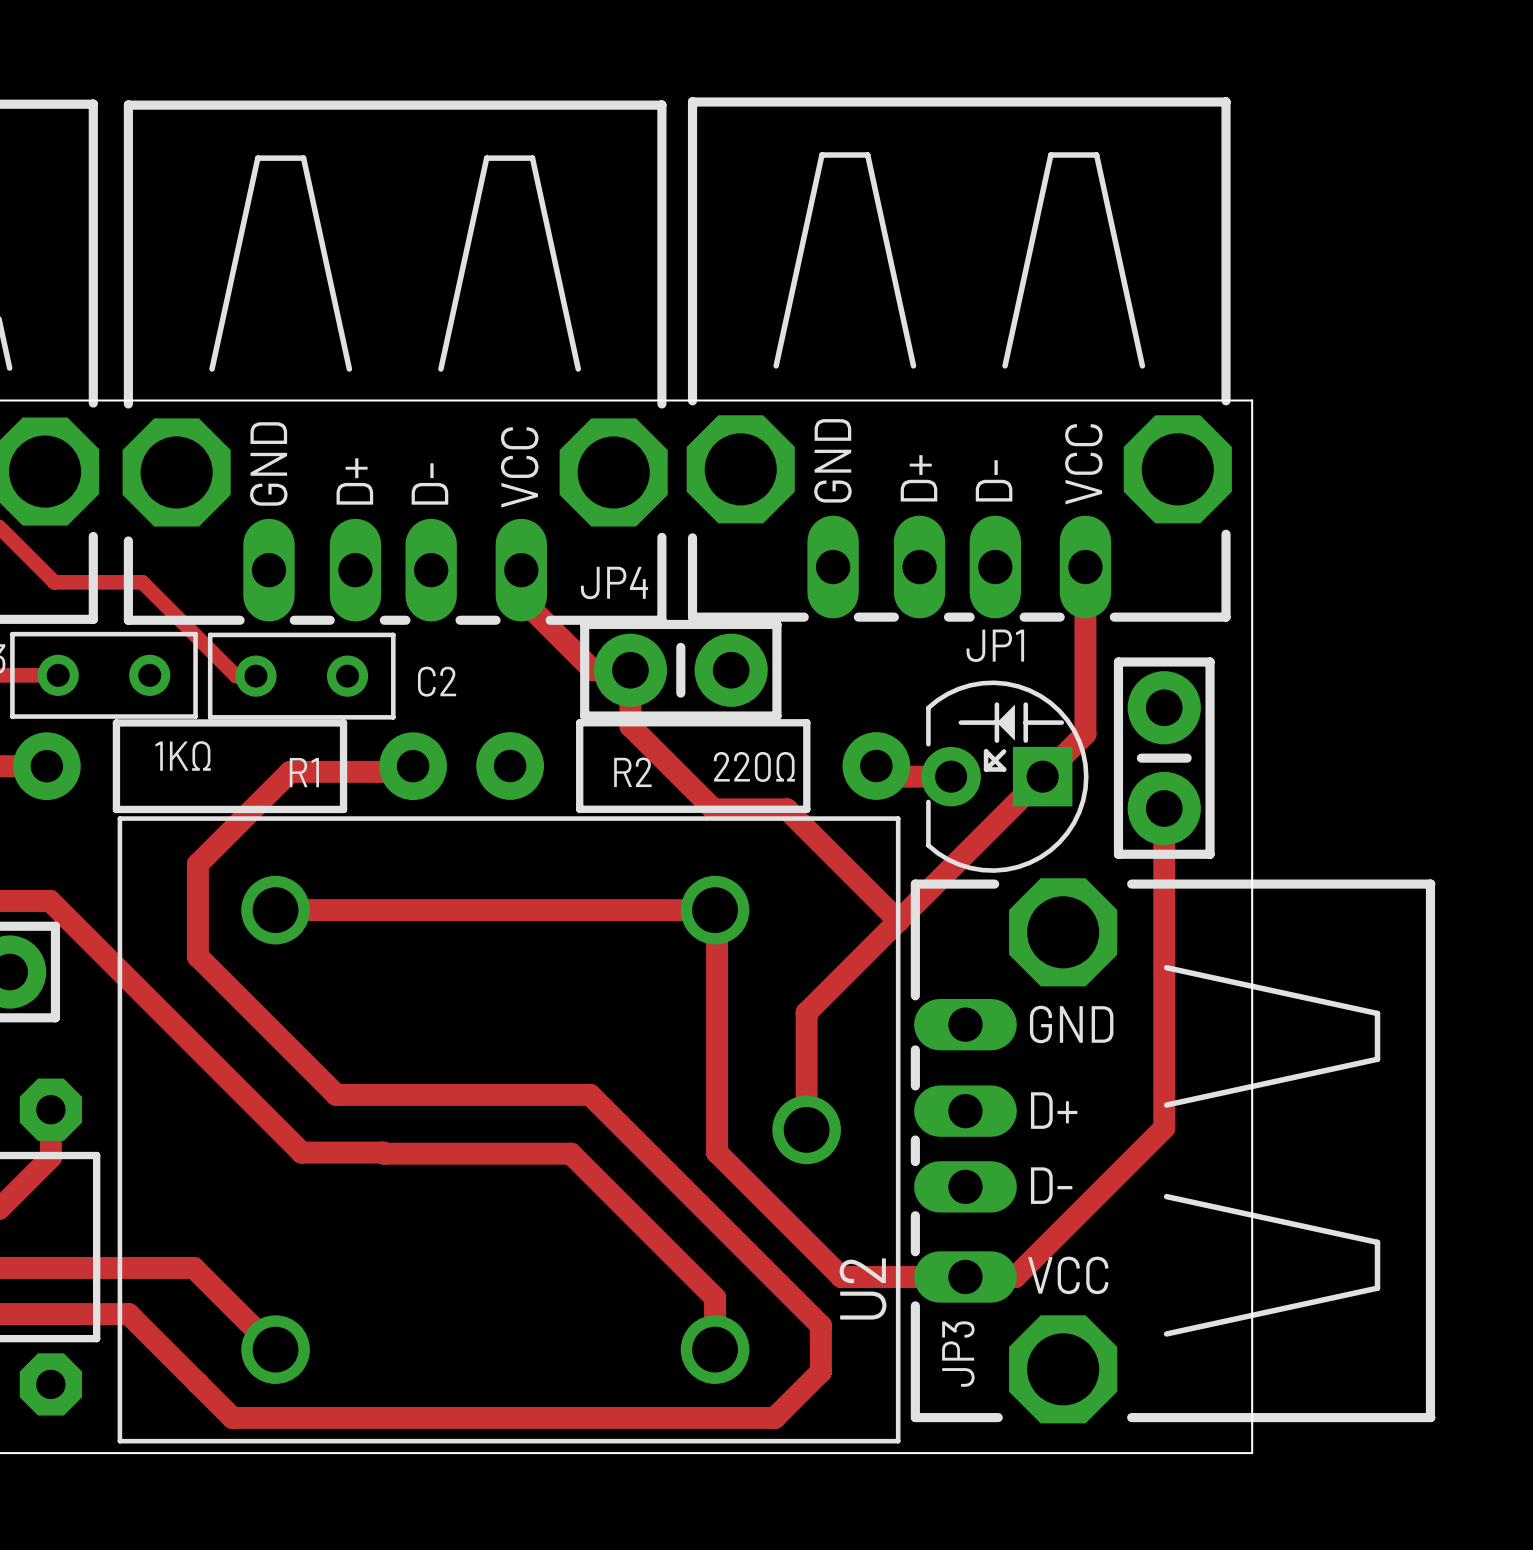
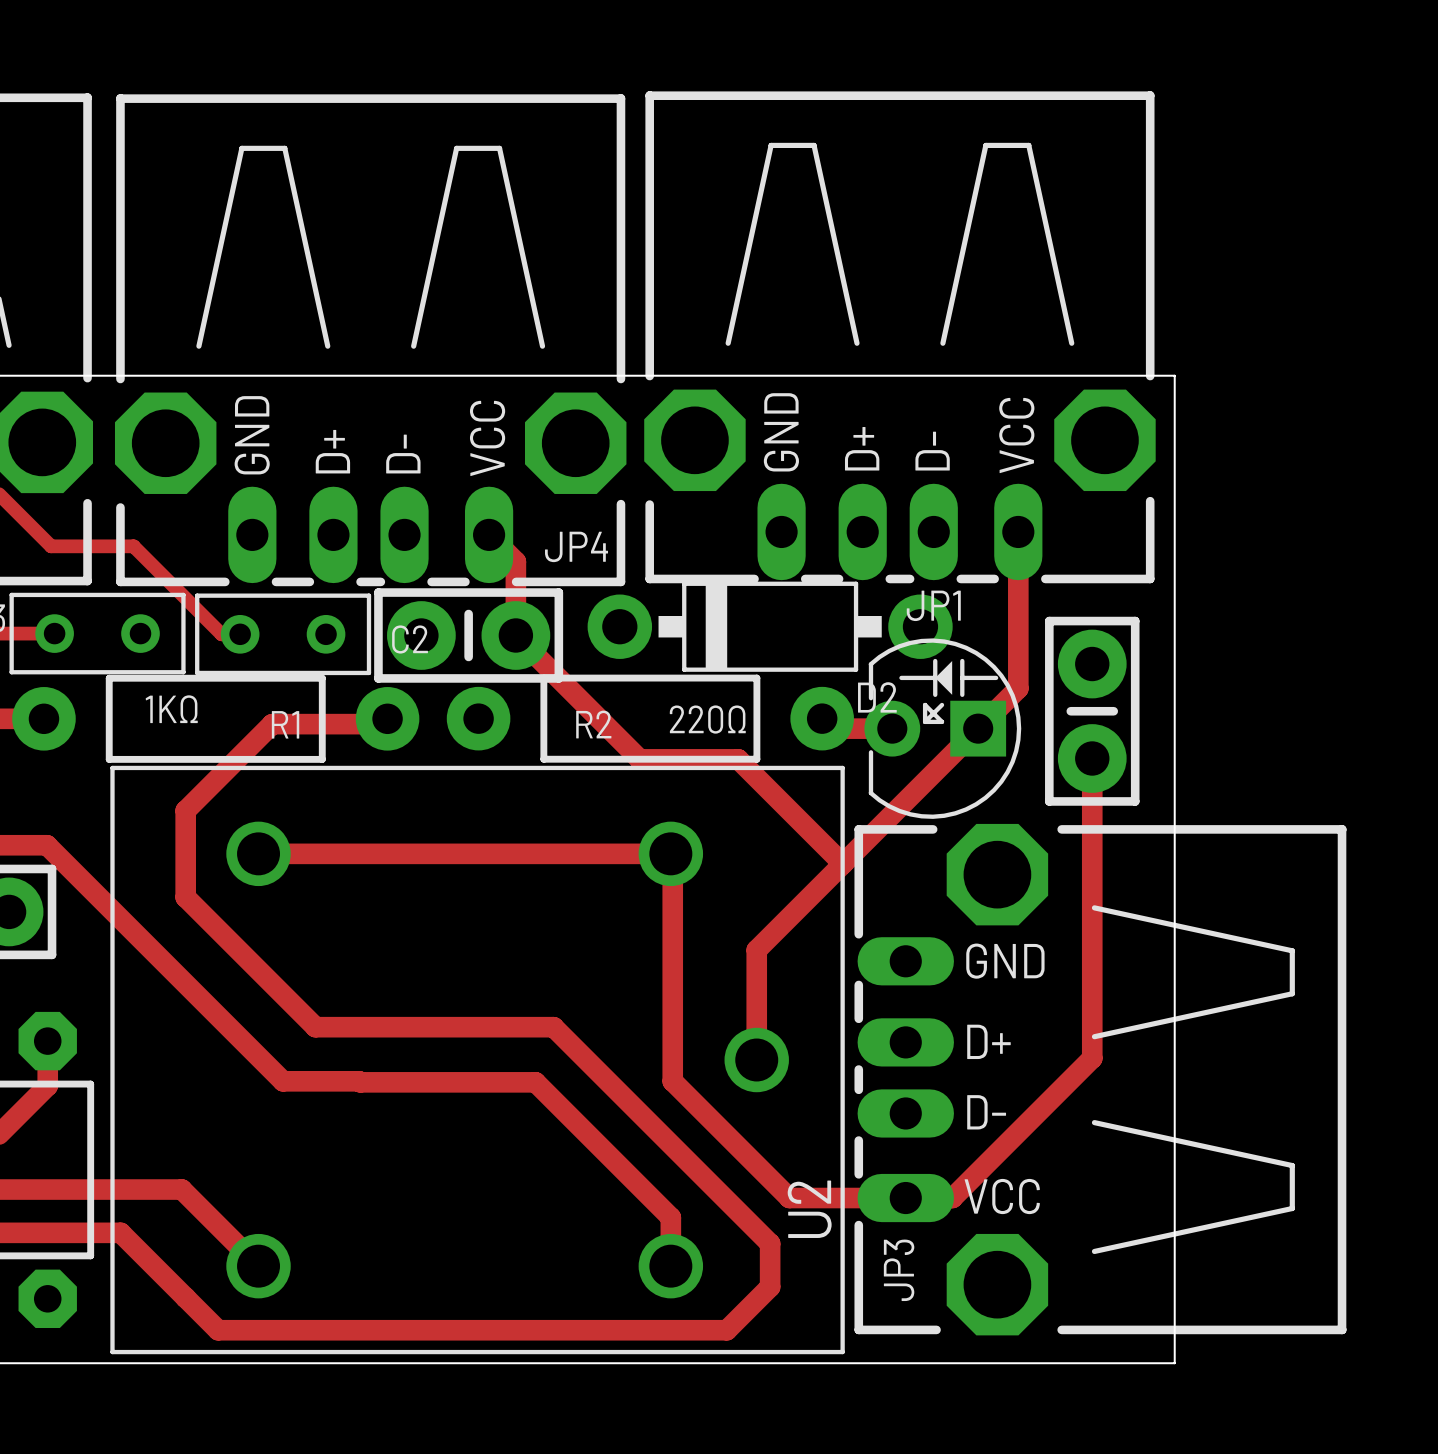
track: (521, 570) (521, 598) (592, 670) (630, 670) (630, 726) (713, 809) -> (489, 534) (515, 561) (515, 635) (639, 759) (669, 759)
D2: none -> (770, 626)
part position: (680, 670) -> (468, 635)

